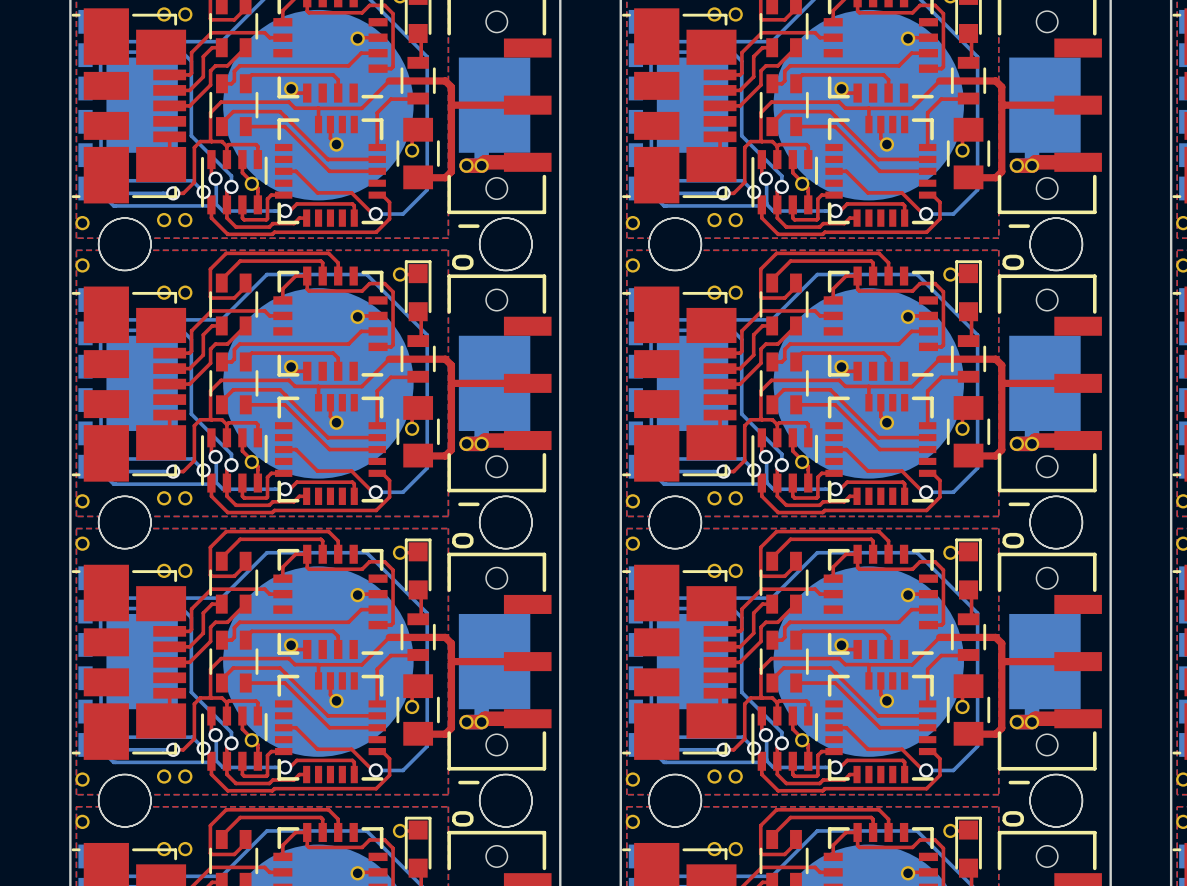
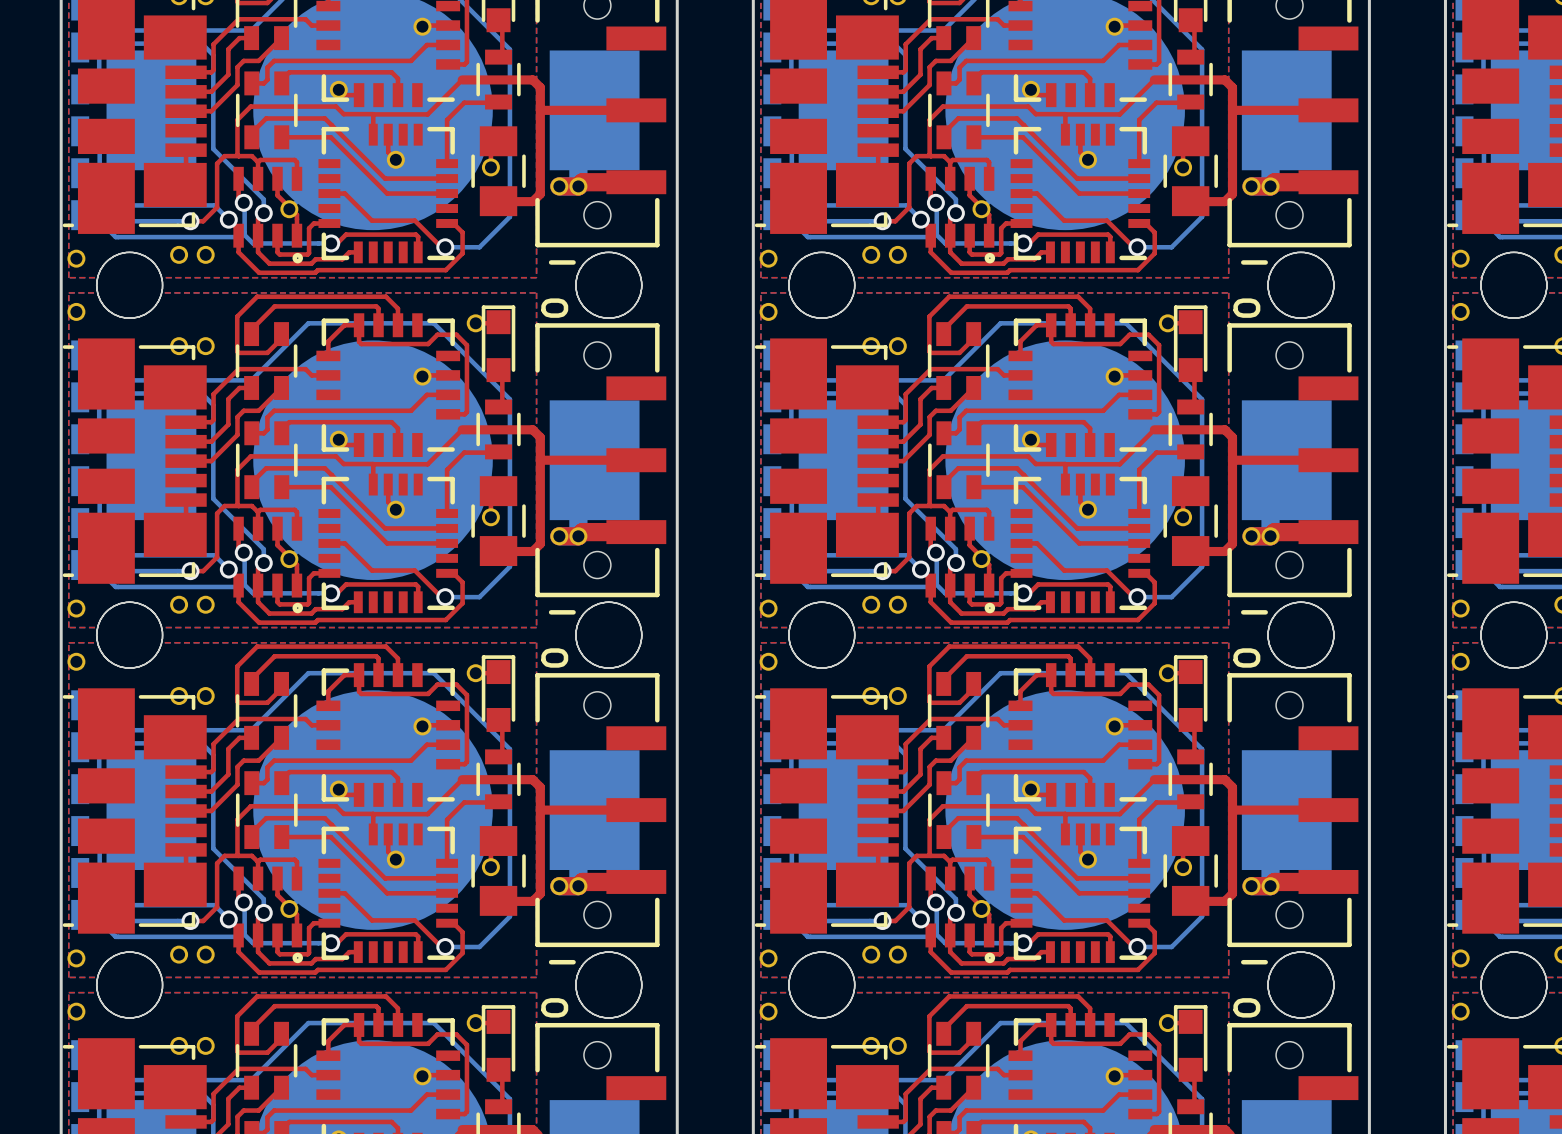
part footprint: [201, 150, 268, 215] -> [233, 166, 303, 264]
part footprint: [751, 150, 819, 215] -> [925, 166, 996, 264]
part footprint: [201, 428, 268, 493] -> [233, 516, 303, 614]
part footprint: [751, 428, 819, 493] -> [925, 516, 996, 614]
part footprint: [201, 706, 268, 771] -> [233, 866, 303, 964]
part footprint: [751, 706, 819, 771] -> [925, 866, 996, 964]

